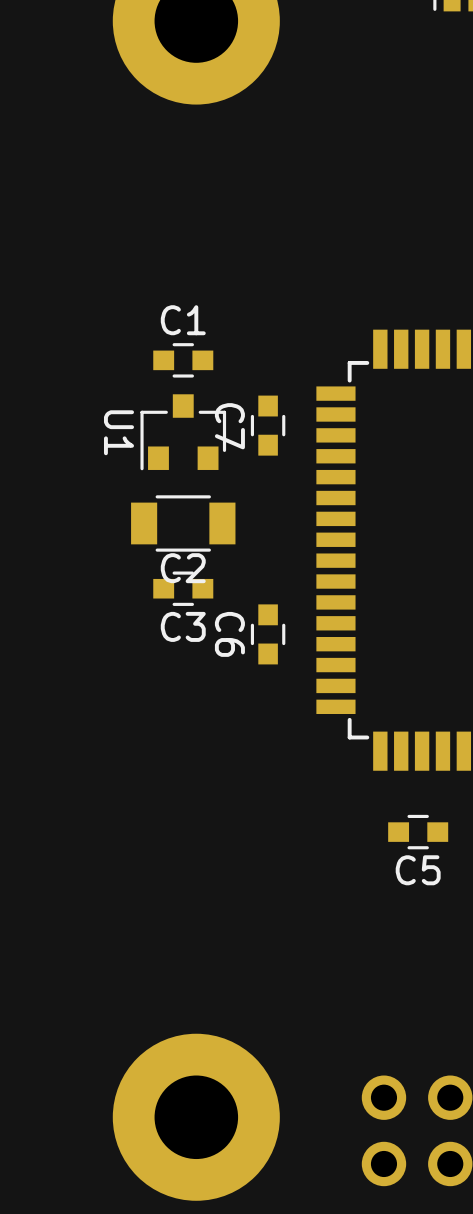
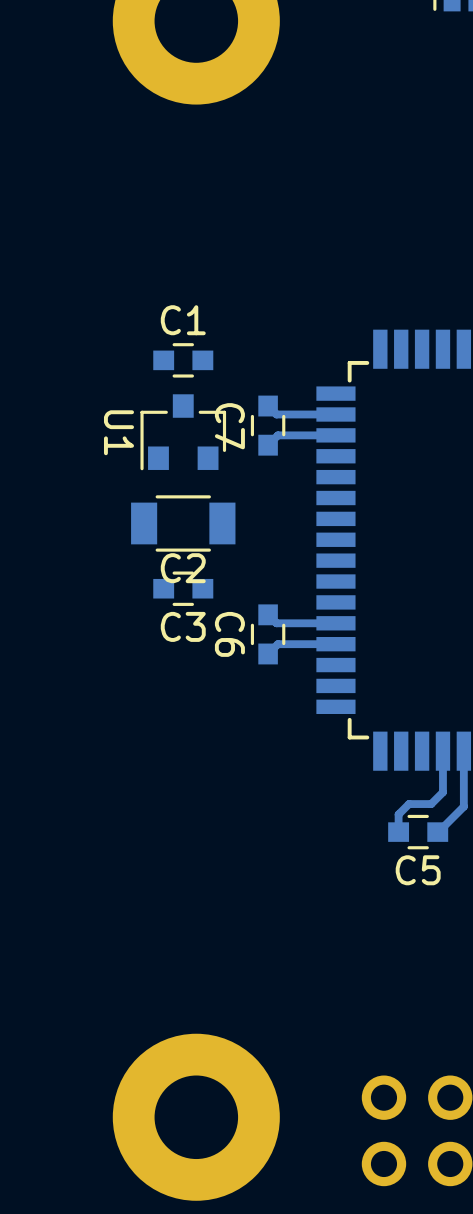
track: none -> (268, 406) (276, 414) (335, 414)
track: none -> (335, 435) (277, 435) (268, 445)
track: none -> (268, 614) (276, 623) (335, 623)
track: none -> (335, 644) (277, 644) (268, 653)
track: none -> (442, 751) (442, 792) (431, 804) (409, 804) (398, 814) (398, 832)
track: none -> (463, 751) (463, 806) (437, 832)

